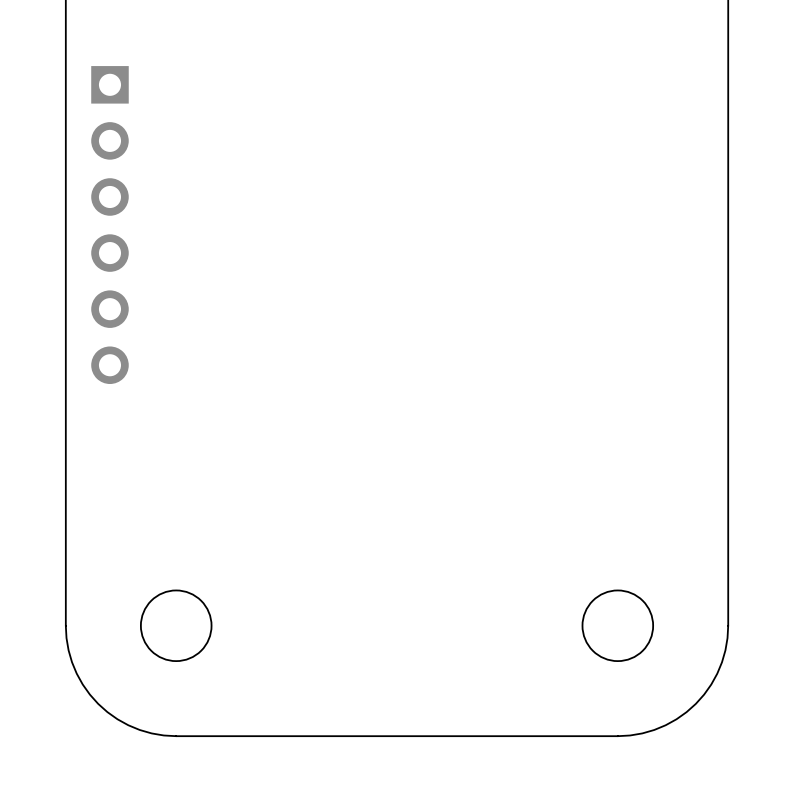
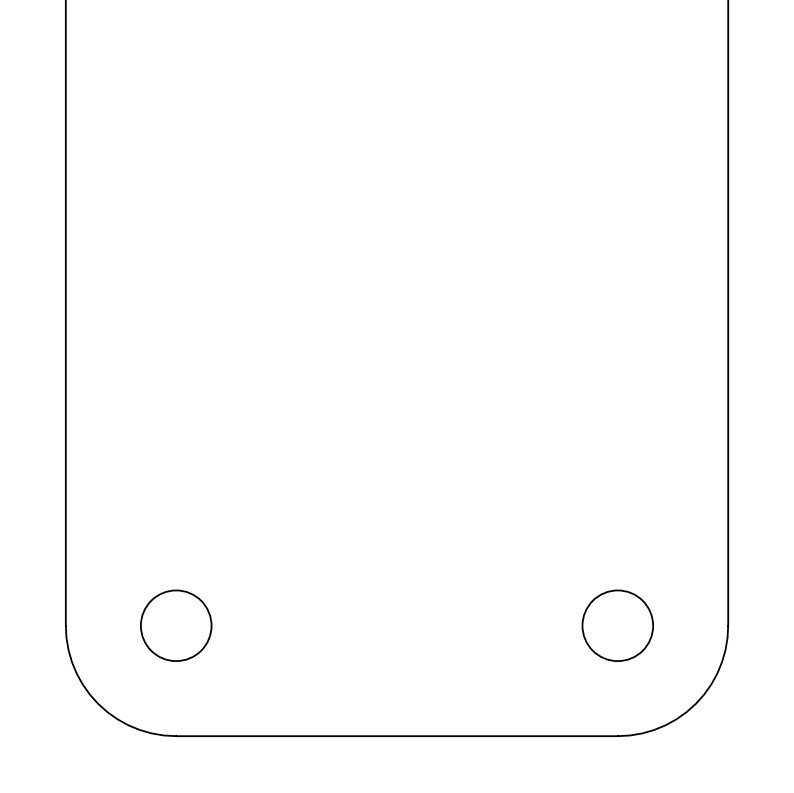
part: (109, 225) -> none

